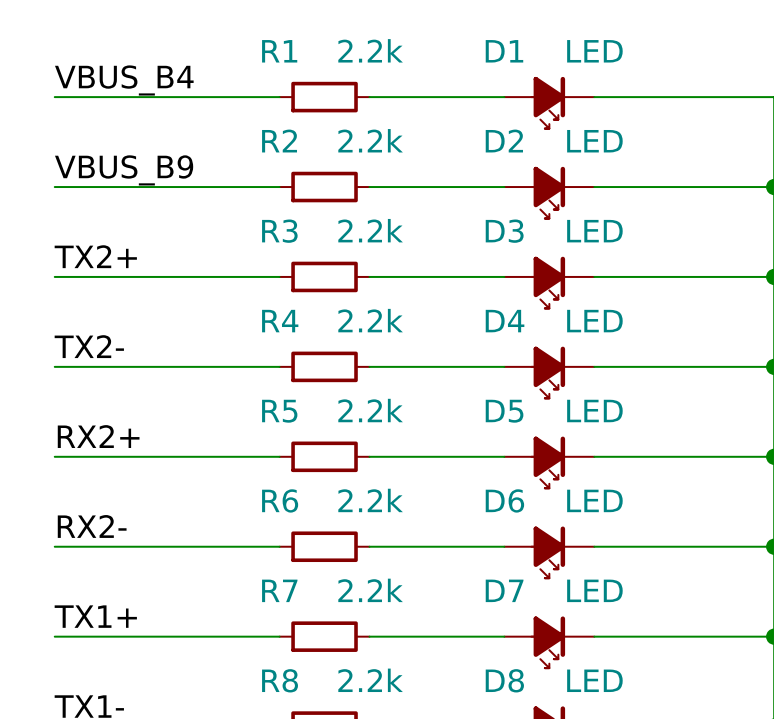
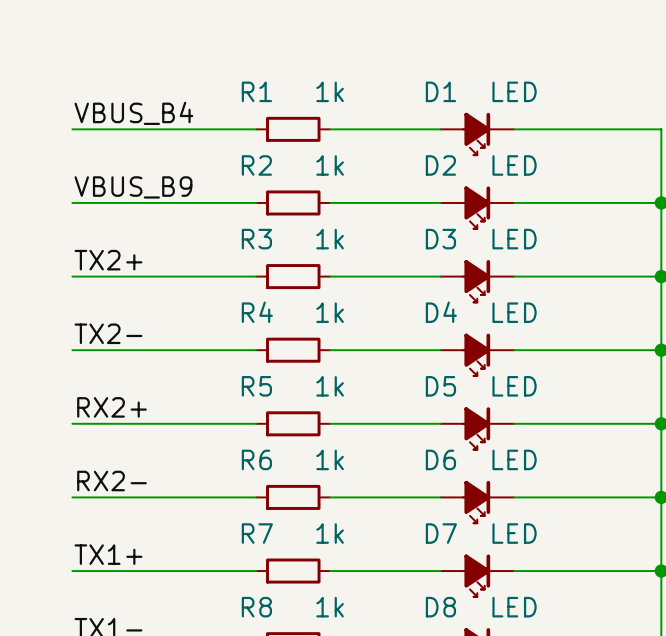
R1 value: 2.2k (370, 50) -> 1k (330, 91)
R2 value: 2.2k (370, 140) -> 1k (330, 165)
R3 value: 2.2k (370, 230) -> 1k (330, 239)
R4 value: 2.2k (370, 320) -> 1k (330, 312)
R5 value: 2.2k (370, 410) -> 1k (330, 386)
R6 value: 2.2k (370, 500) -> 1k (330, 459)
R7 value: 2.2k (370, 590) -> 1k (330, 533)
R8 value: 2.2k (370, 680) -> 1k (330, 607)

